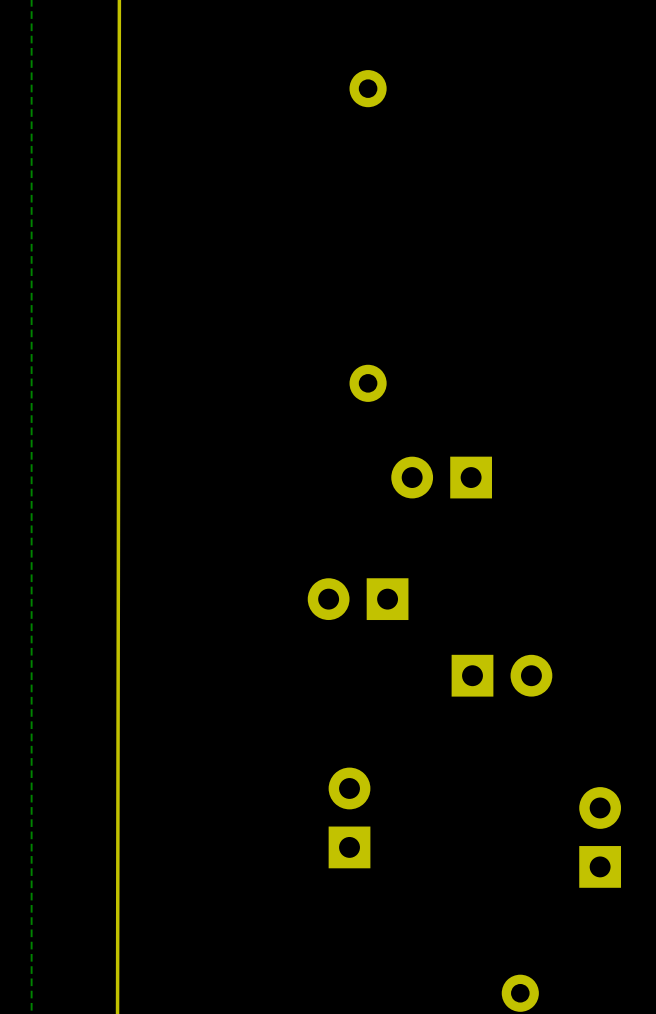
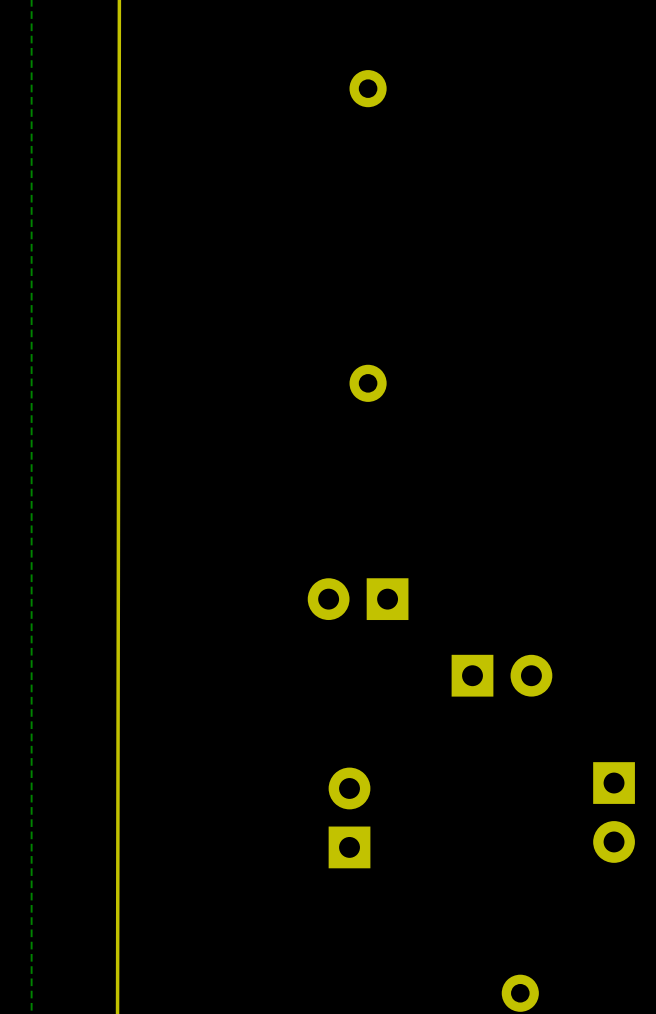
part: (441, 477) -> none
part rotation: 0° (600, 837) -> 180° (614, 812)

